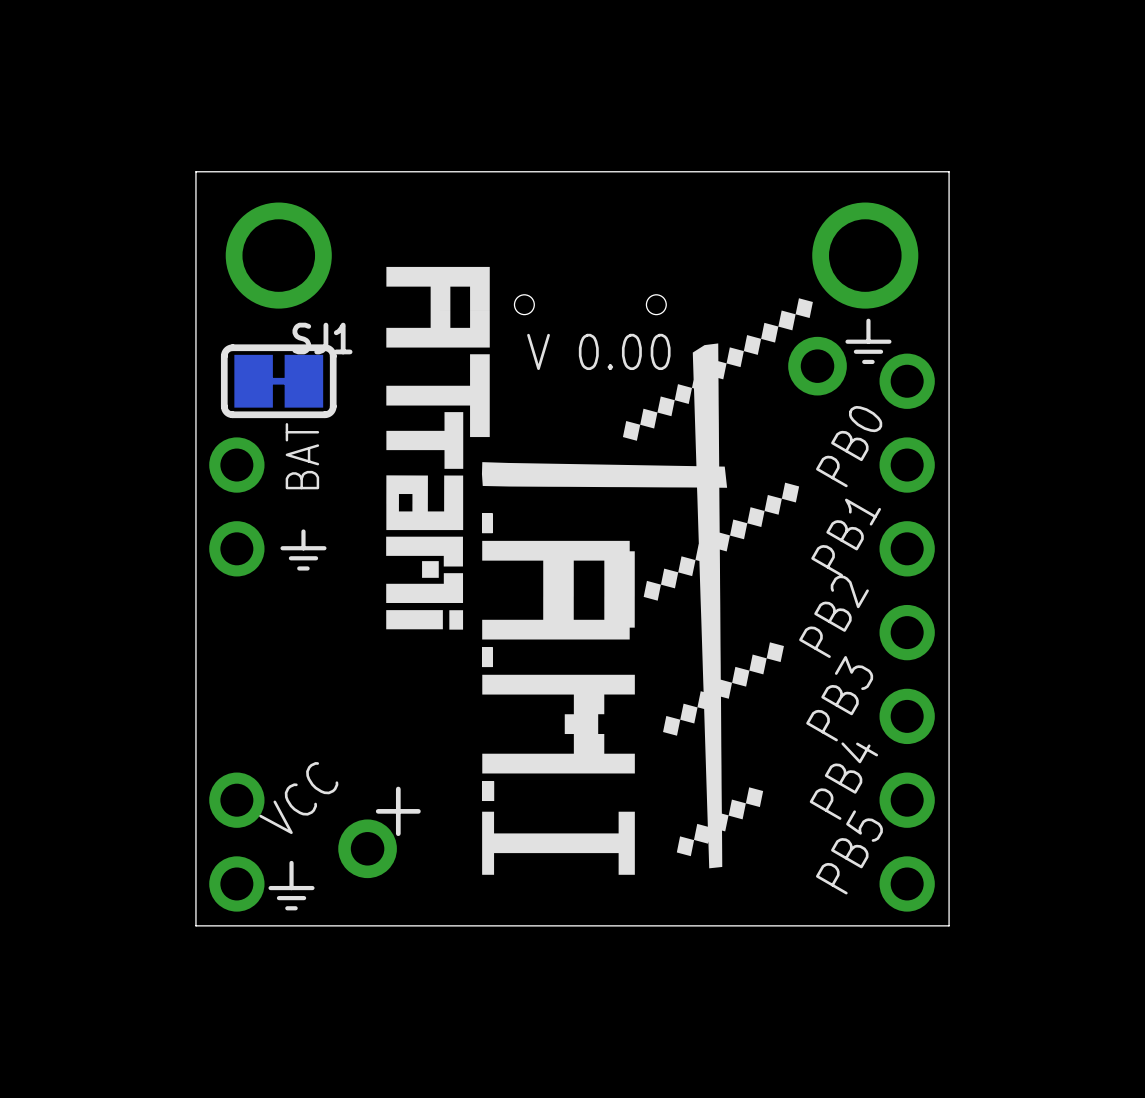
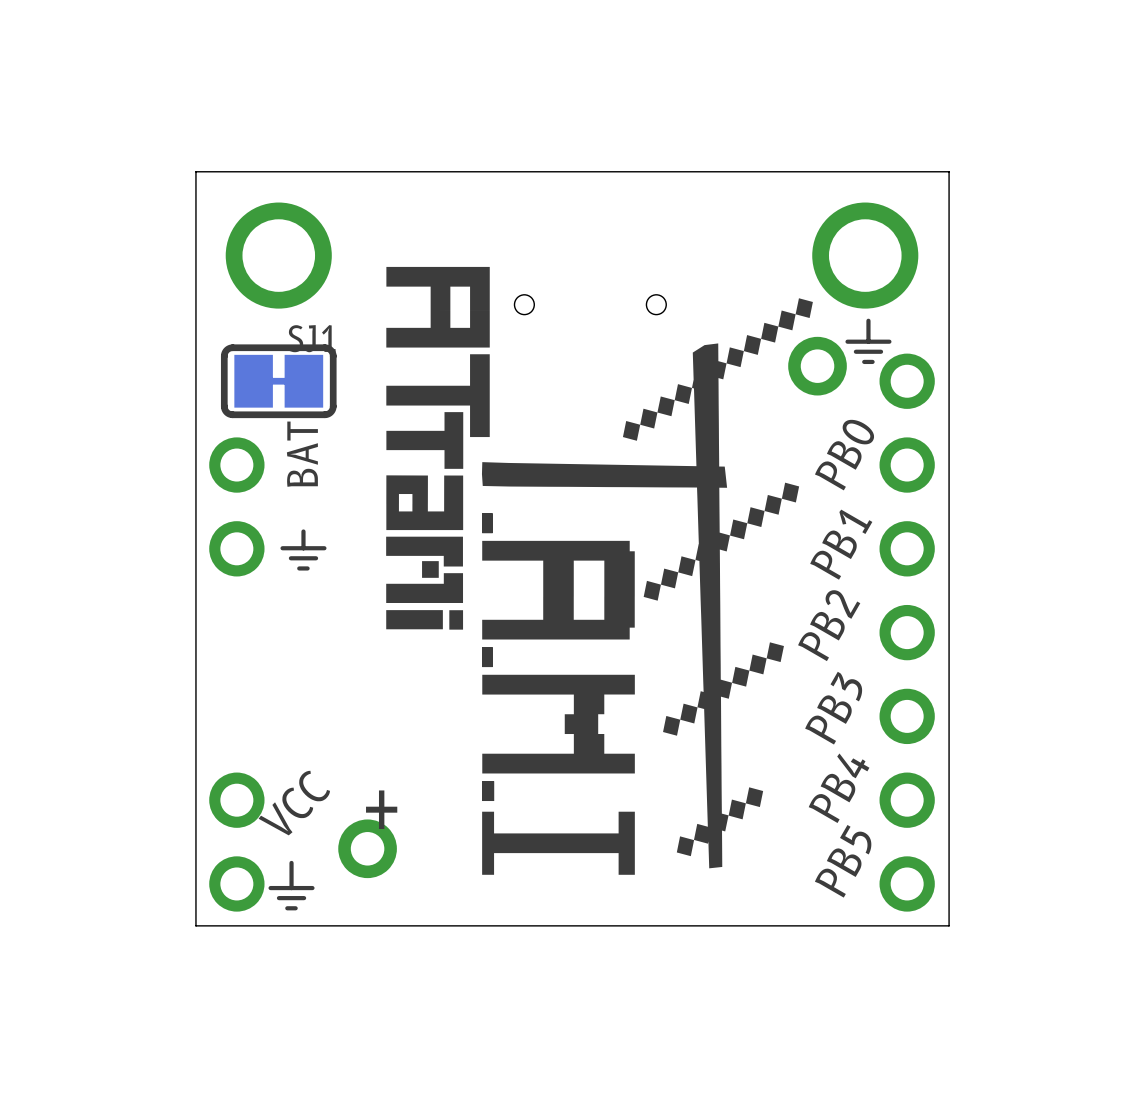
text: V 0.00 (598, 351) -> none

